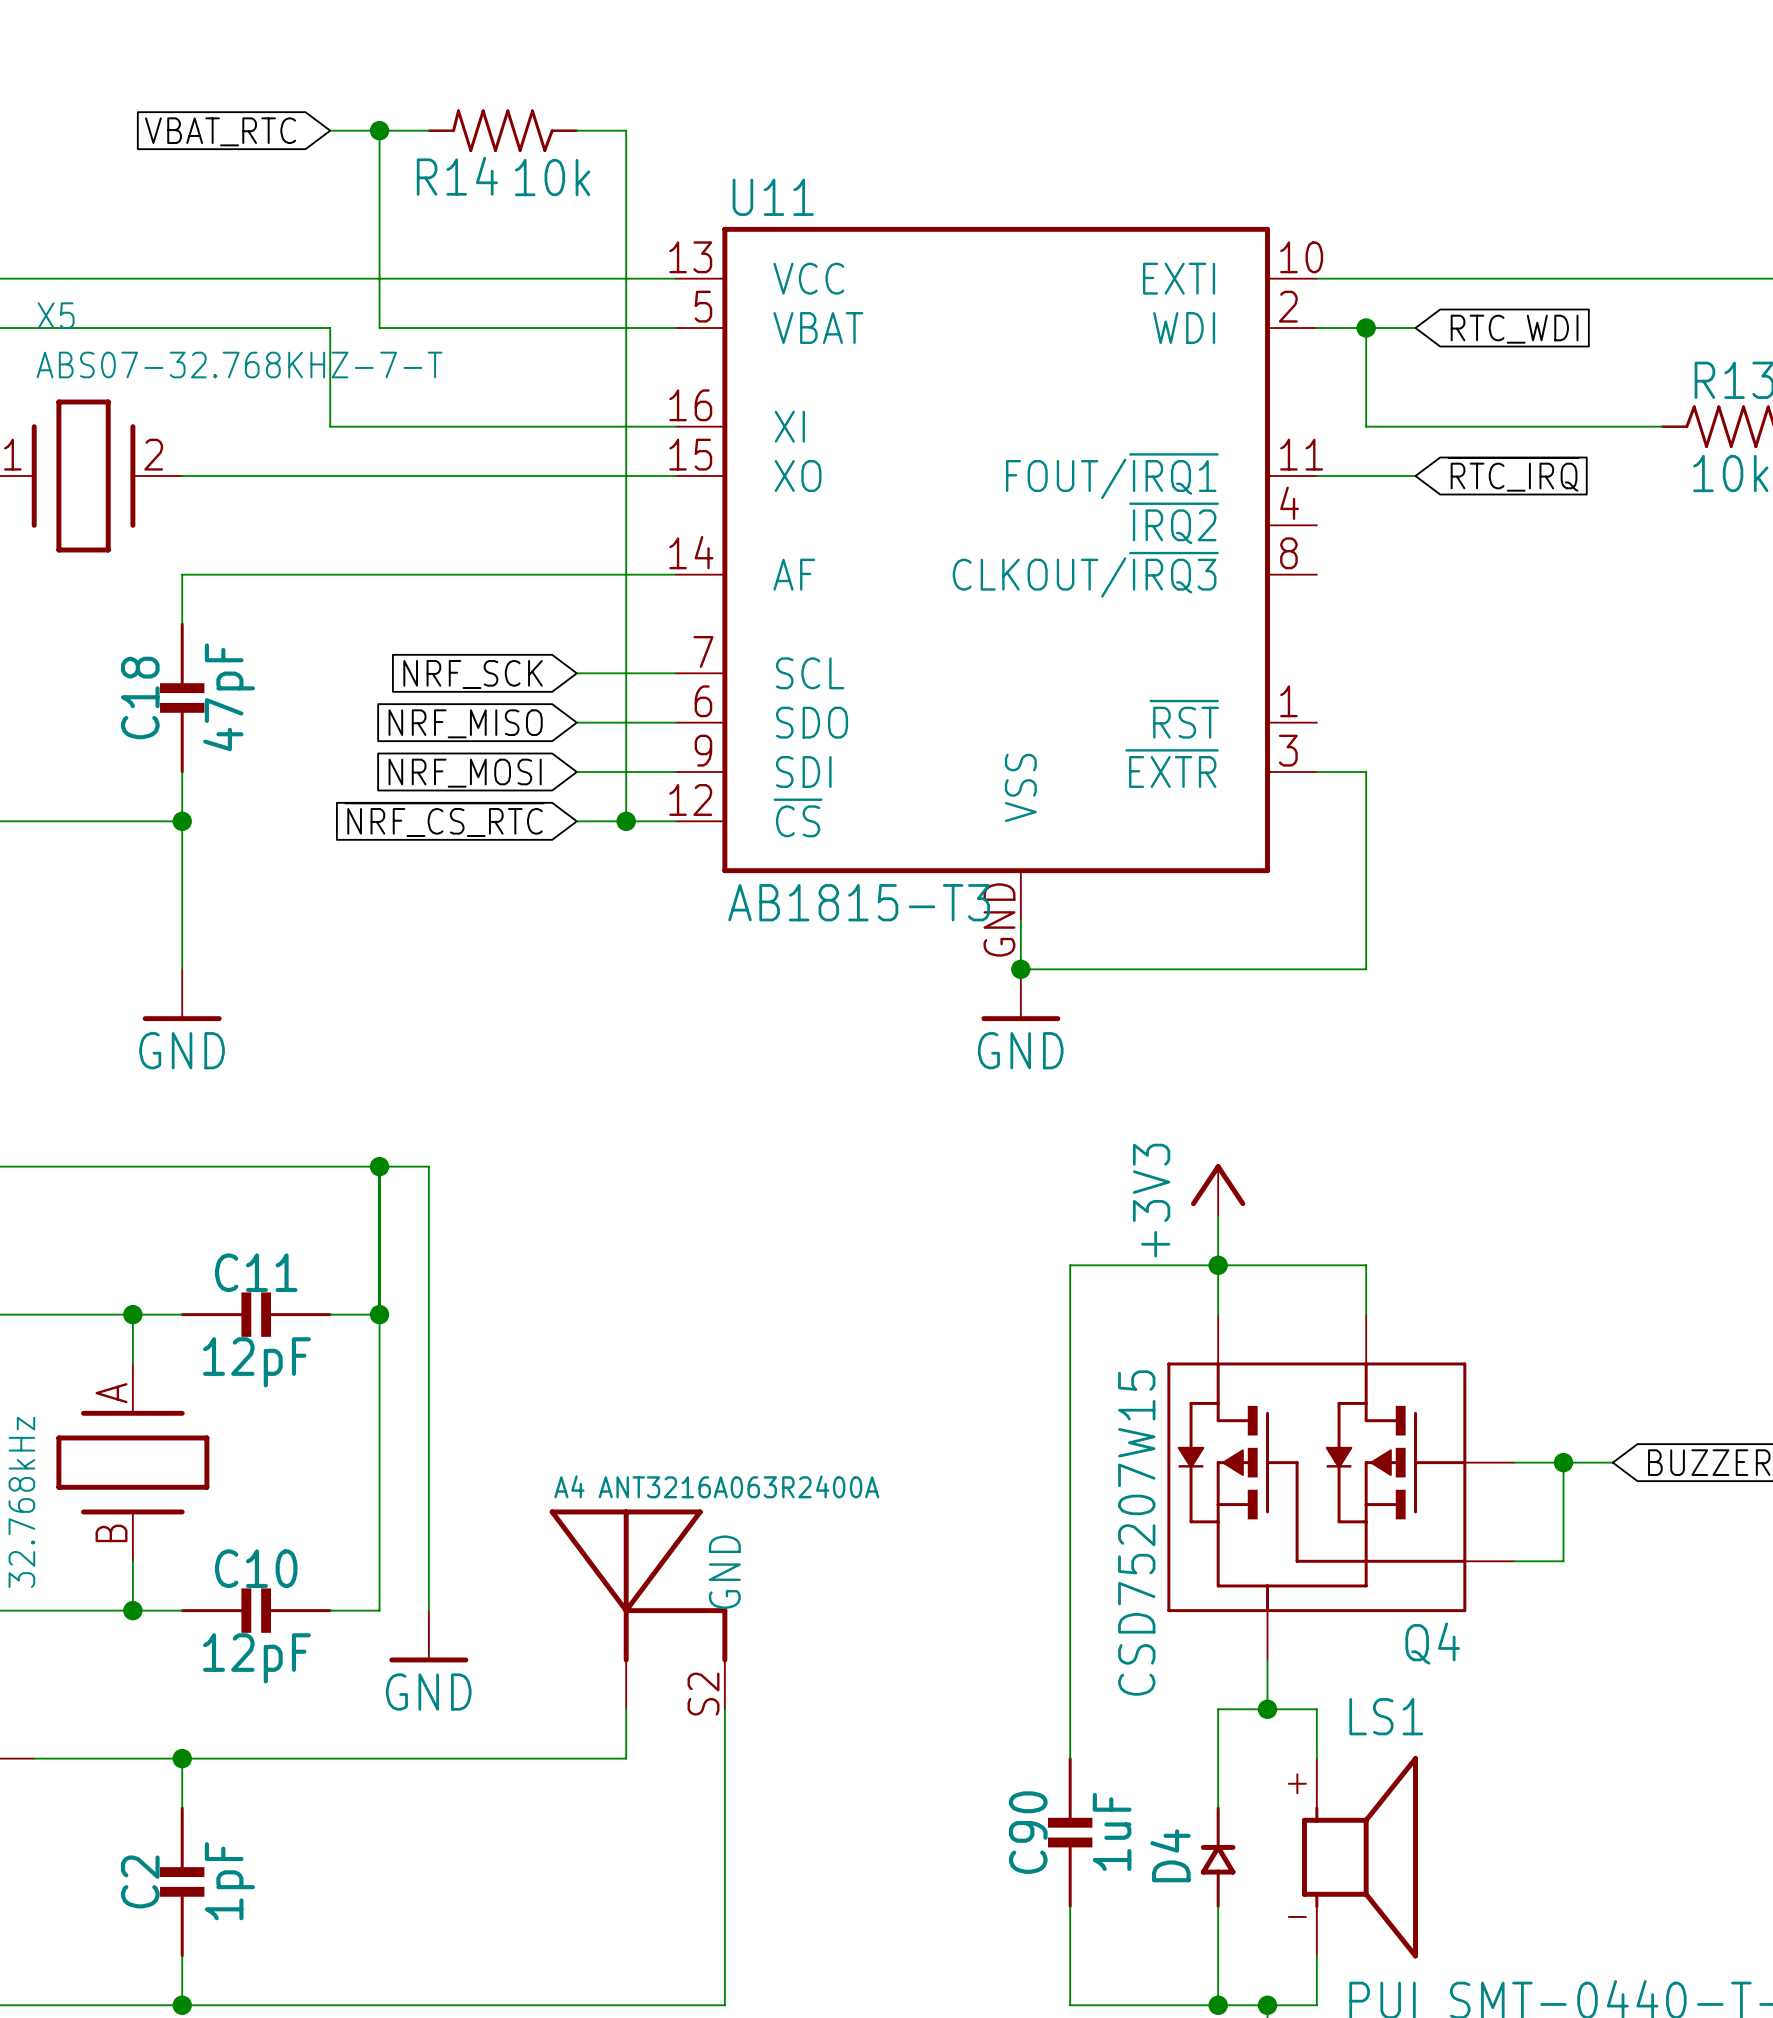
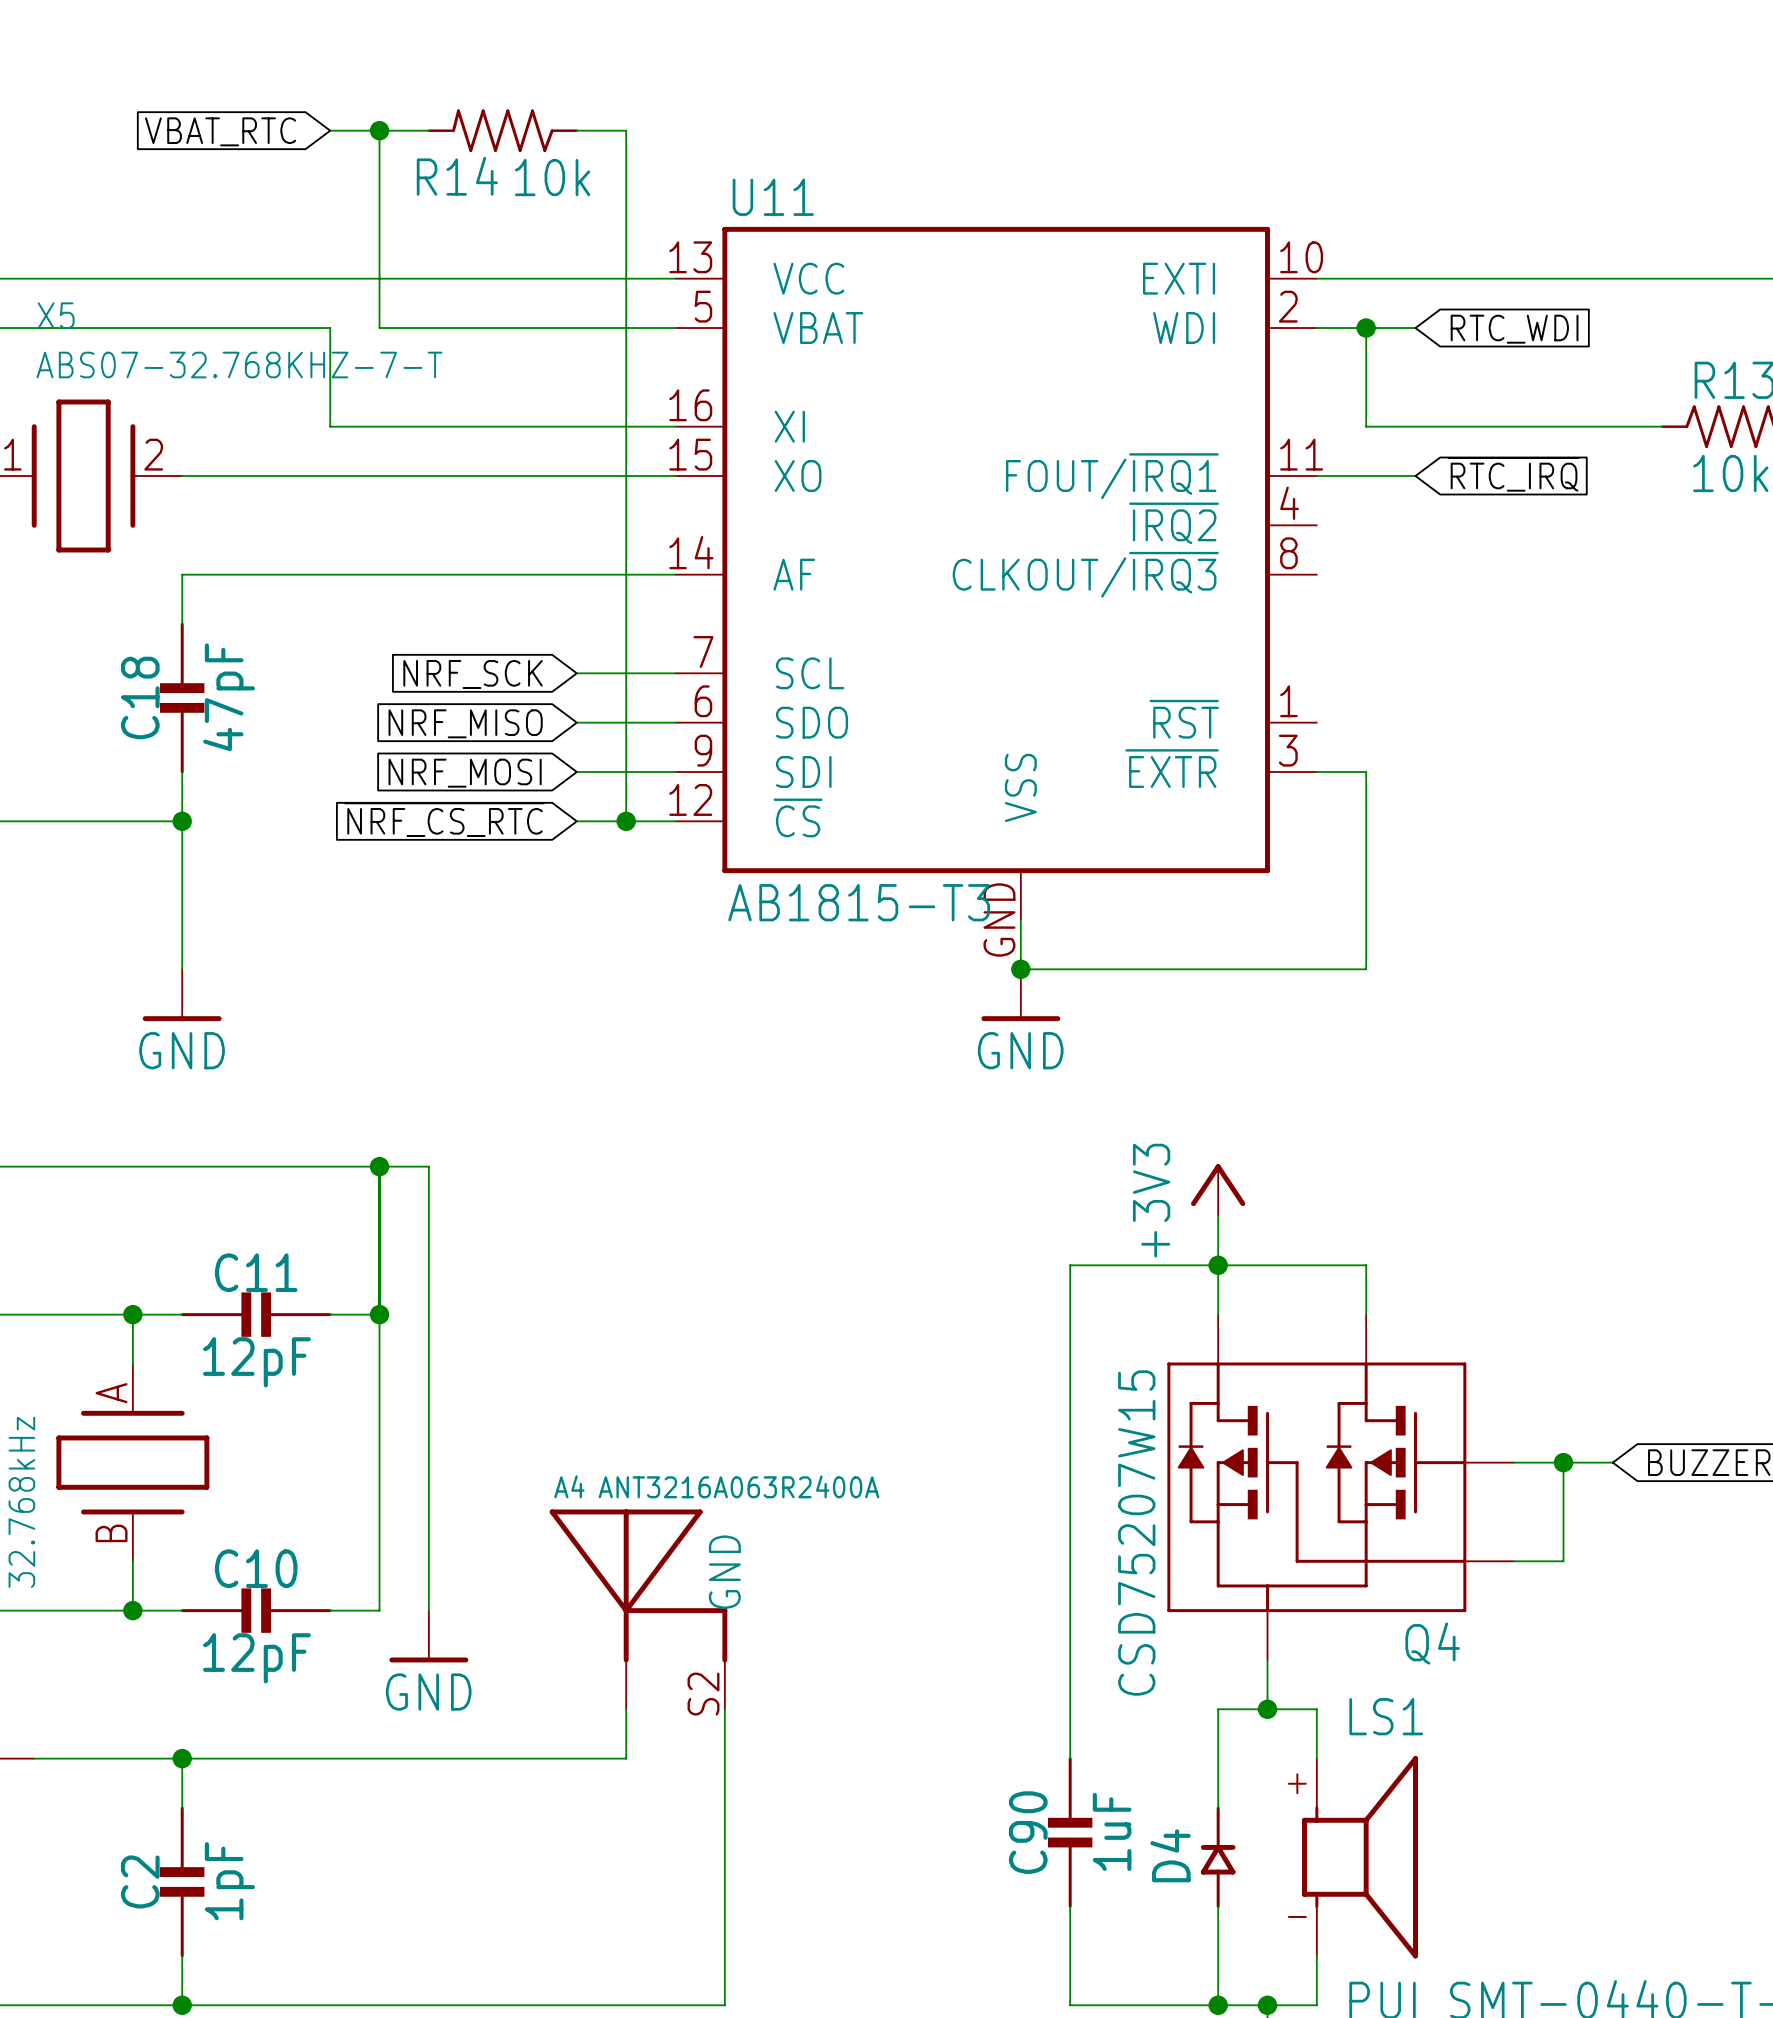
Q4 symbol: [1167, 1314, 1515, 1660] -> [1167, 1314, 1515, 1660]

